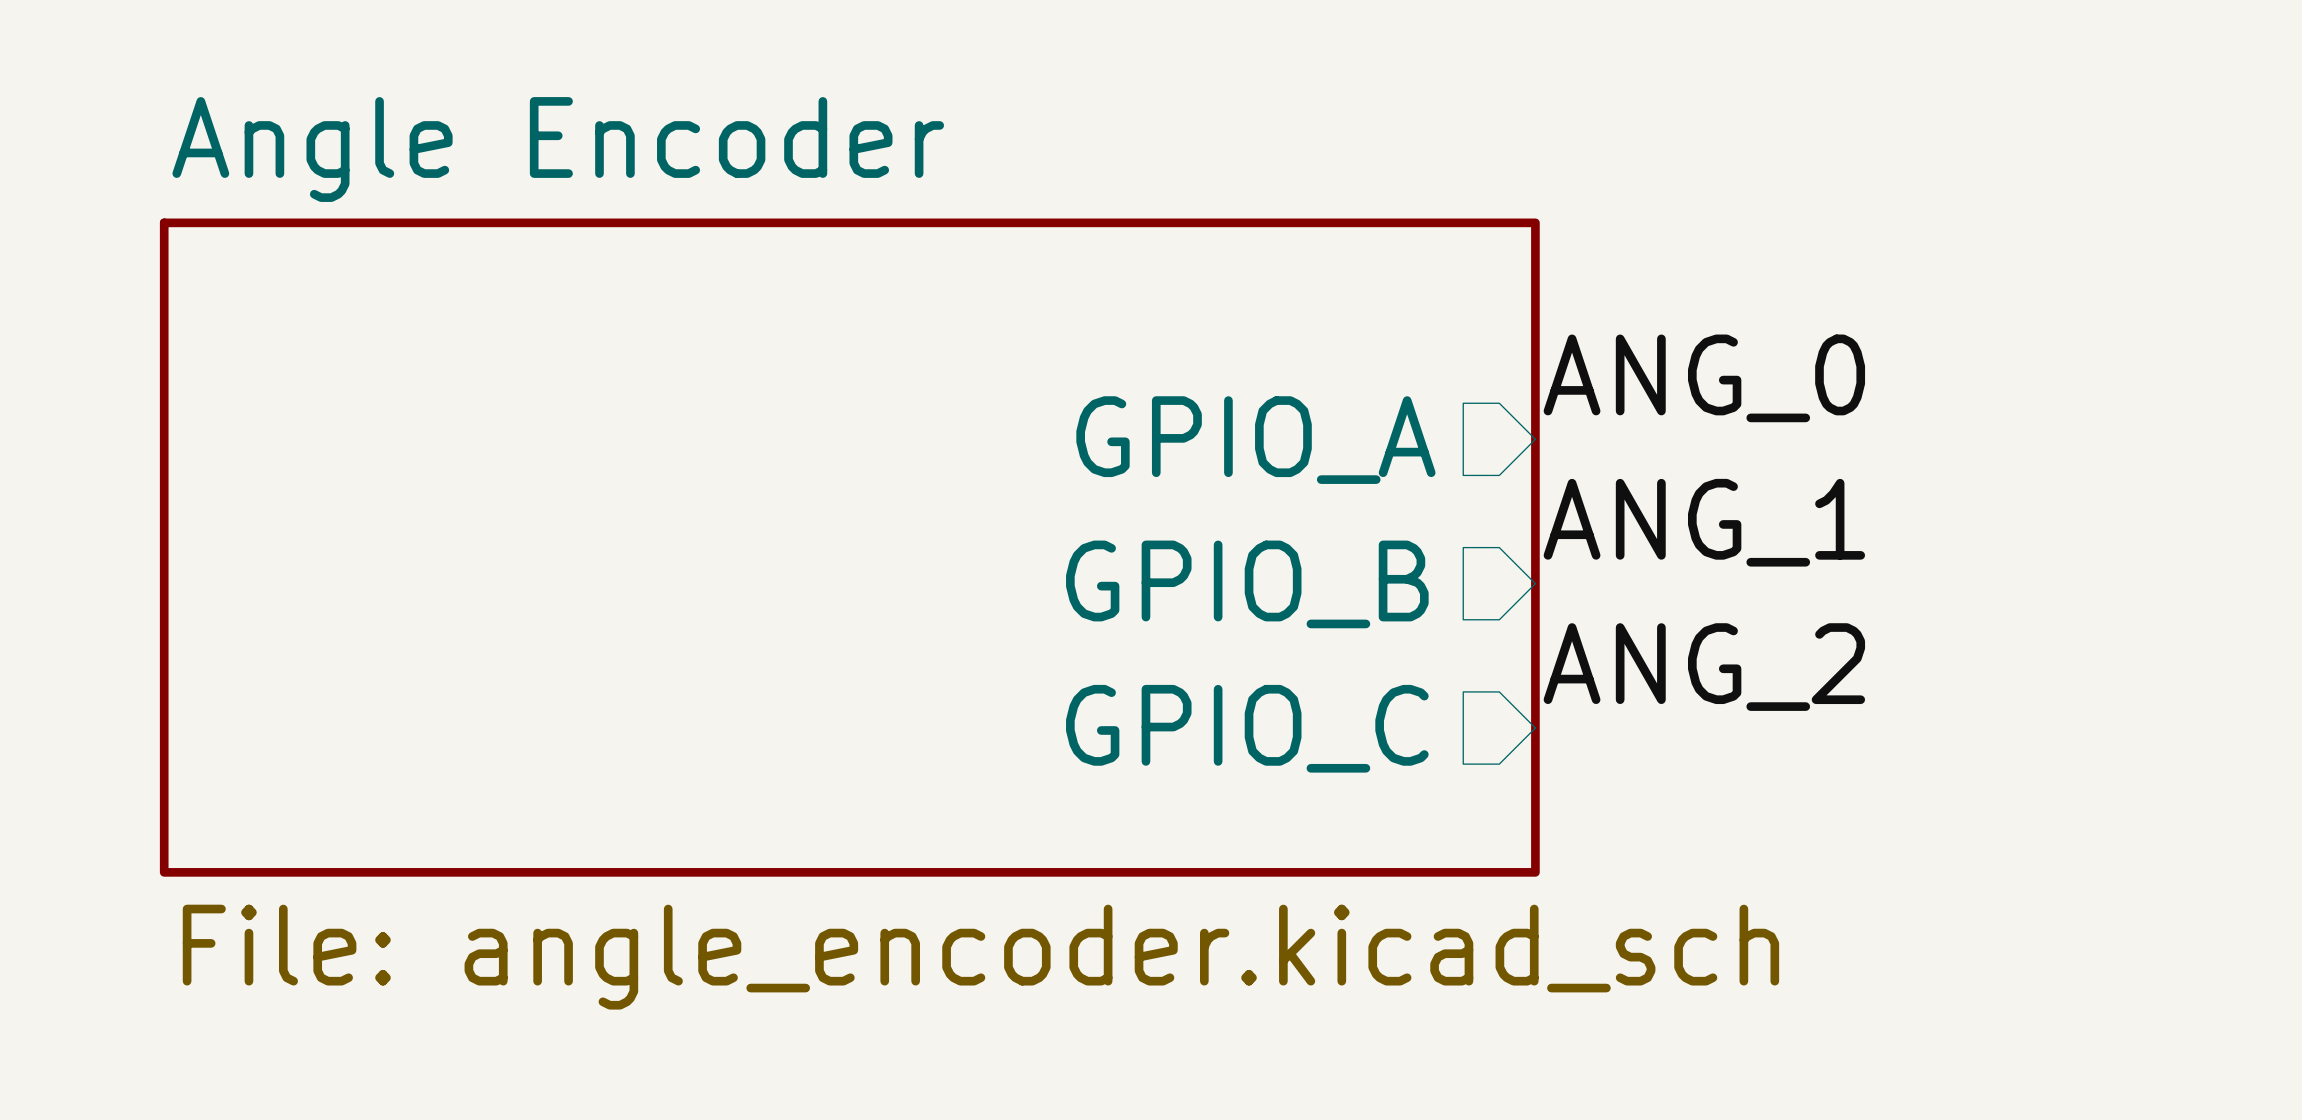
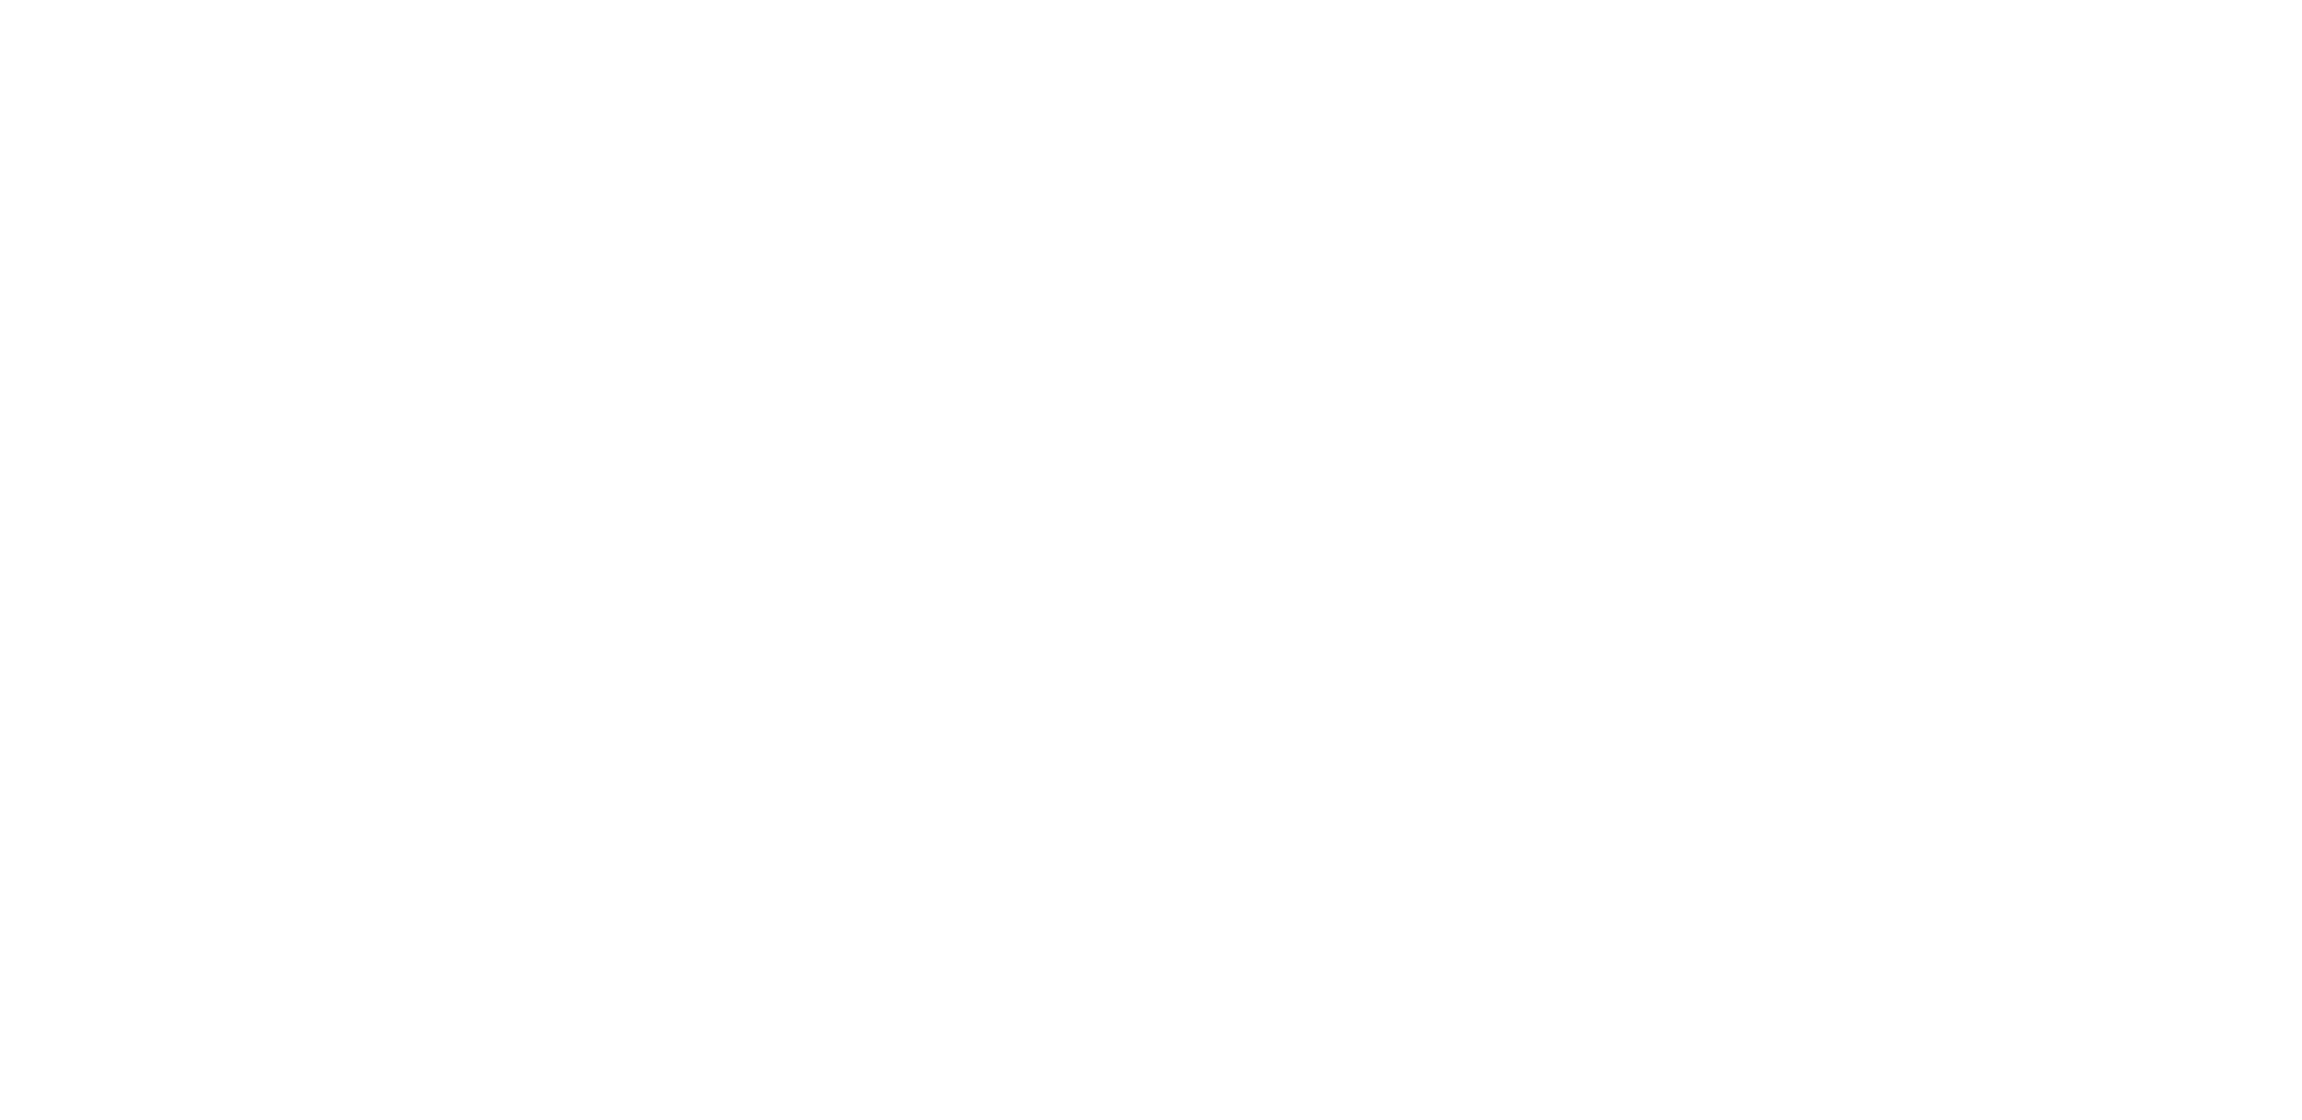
label: ANG_0 (1704, 378) -> none
sheet pin: GPIO_A (1255, 440) -> none
label: ANG_1 (1704, 522) -> none
sheet Angle Encoder: File: angle_encoder.kicad_sch (849, 547) -> none
sheet pin: GPIO_B (1247, 584) -> none
label: ANG_2 (1704, 667) -> none
sheet pin: GPIO_C (1247, 728) -> none

